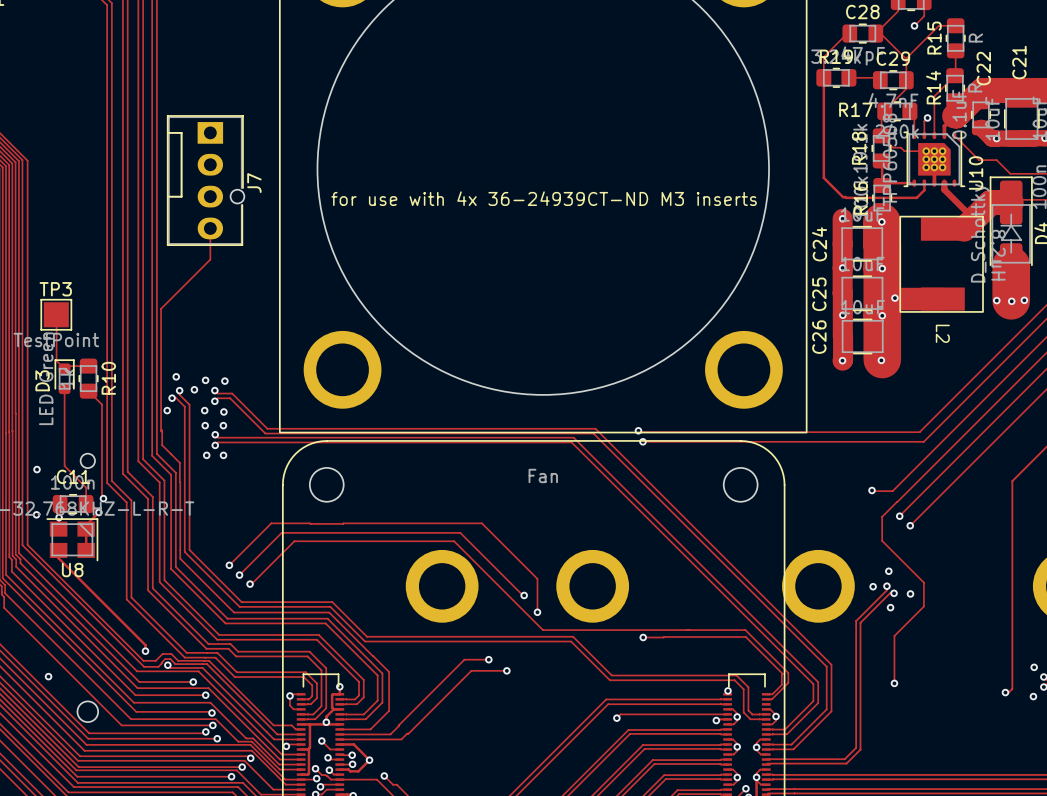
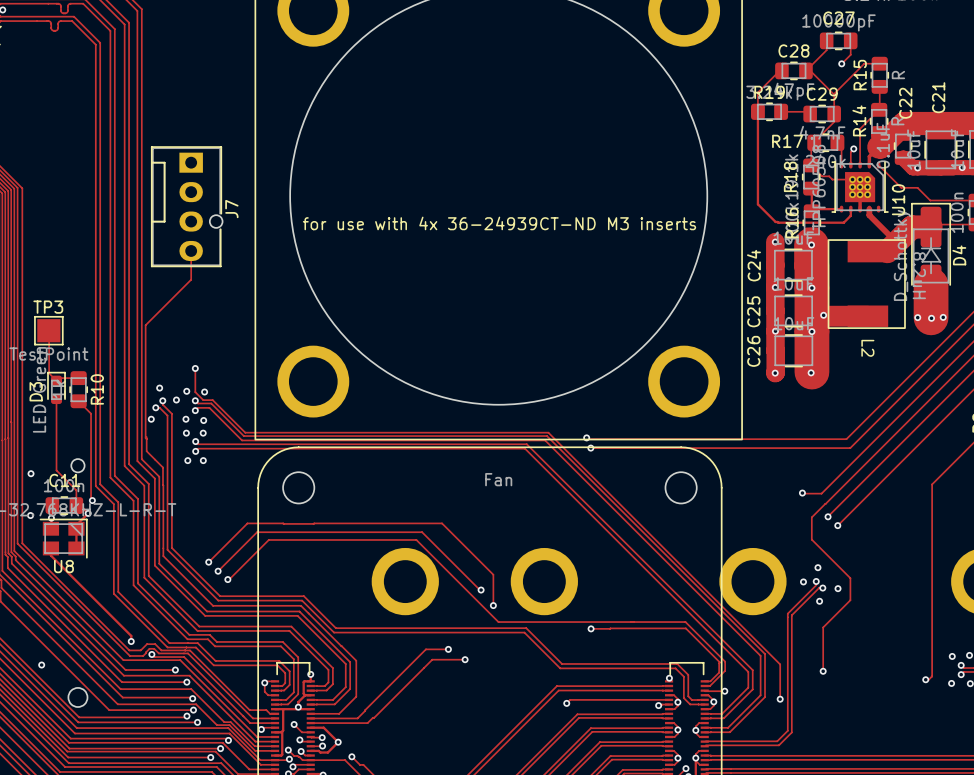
track: none -> (195, 368) (195, 392) (203, 400) (212, 400) (245, 432) (548, 432) (780, 664) (780, 699)
via: none -> (195, 368)
track: none -> (704, 690) (724, 691)
via: none -> (724, 691)
via: none -> (780, 699)

